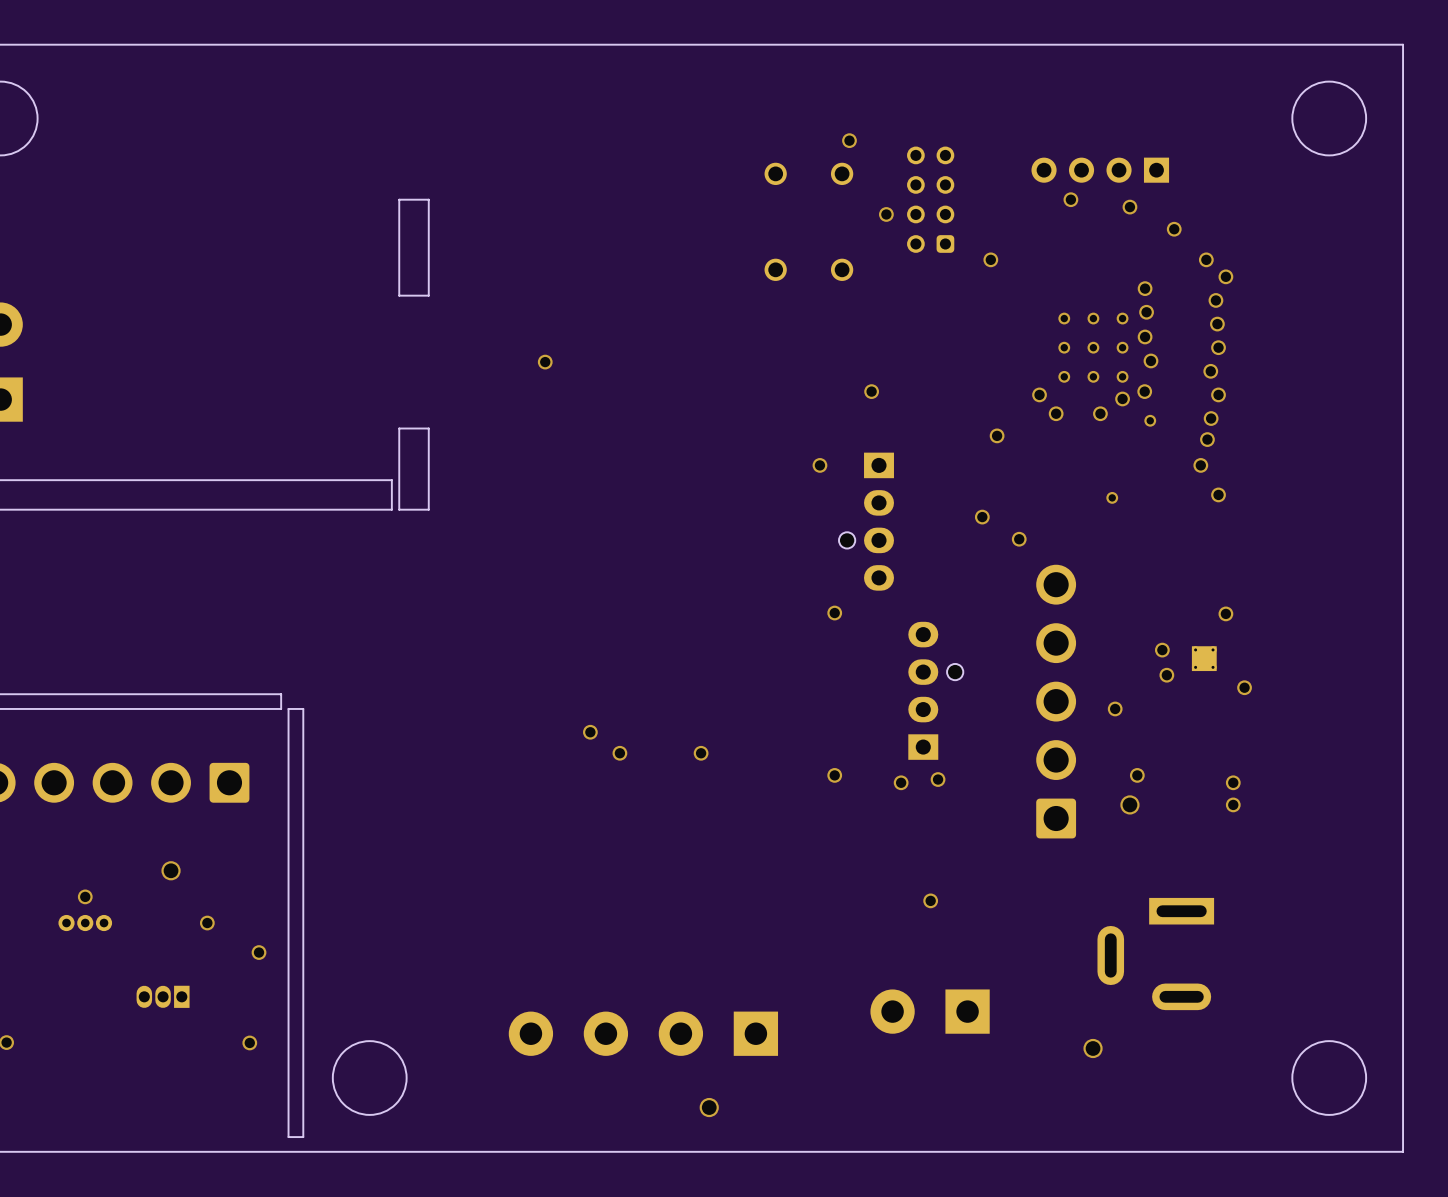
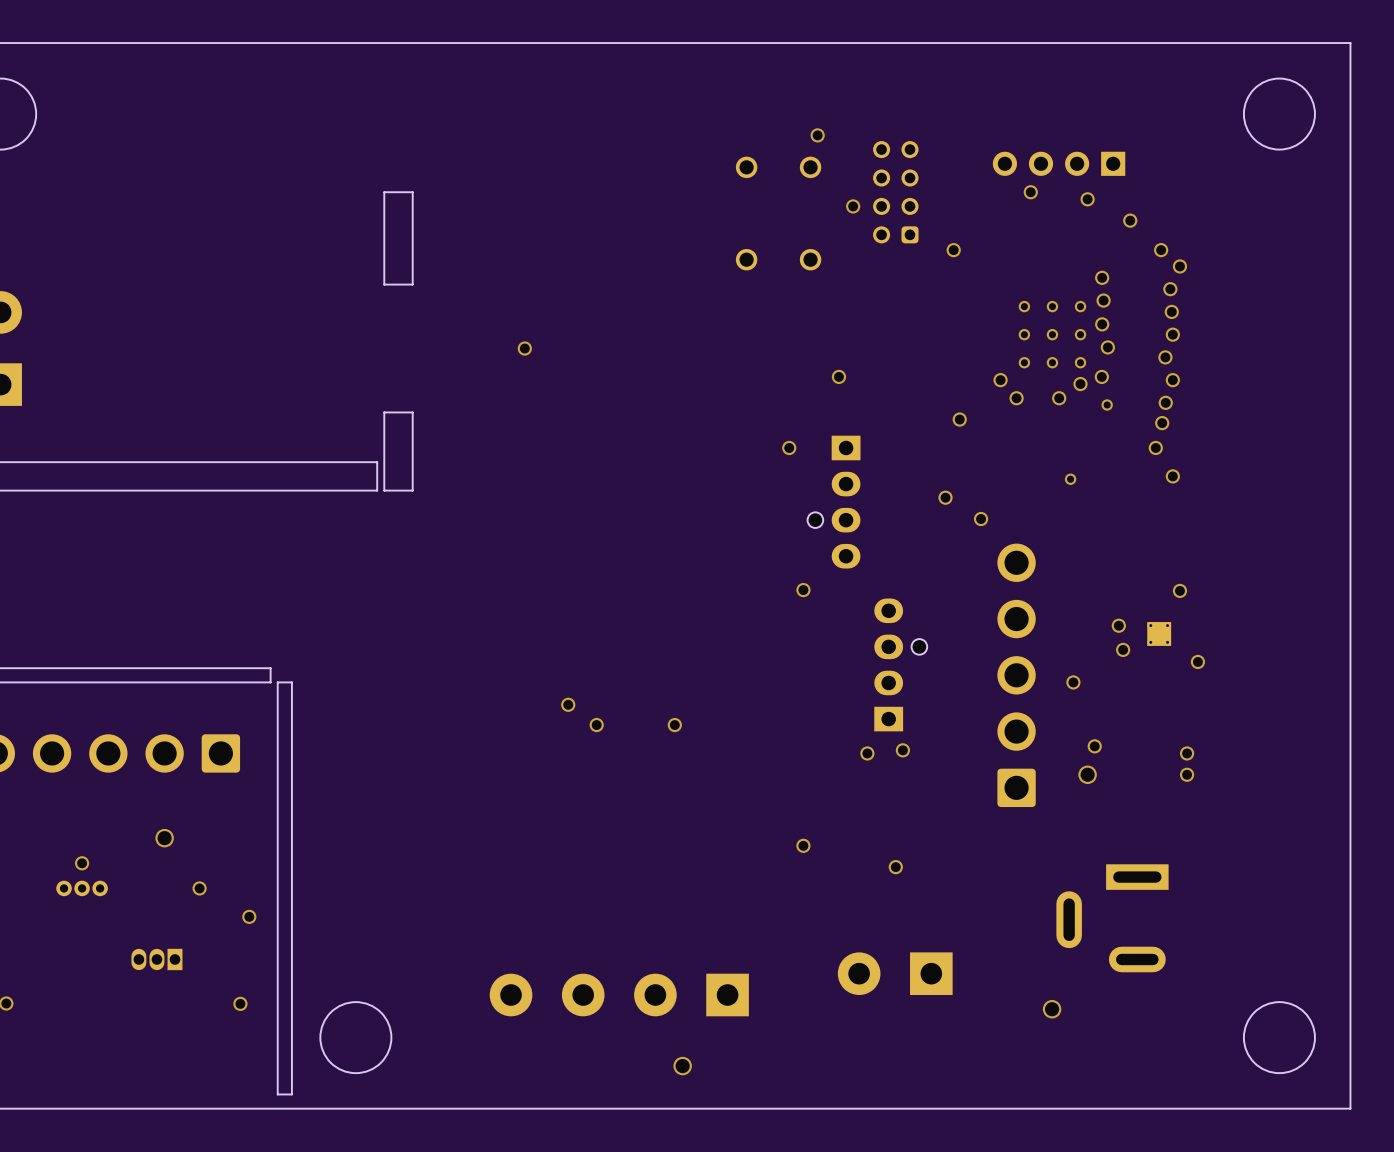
via: (834, 775) -> none
via: none -> (803, 845)

